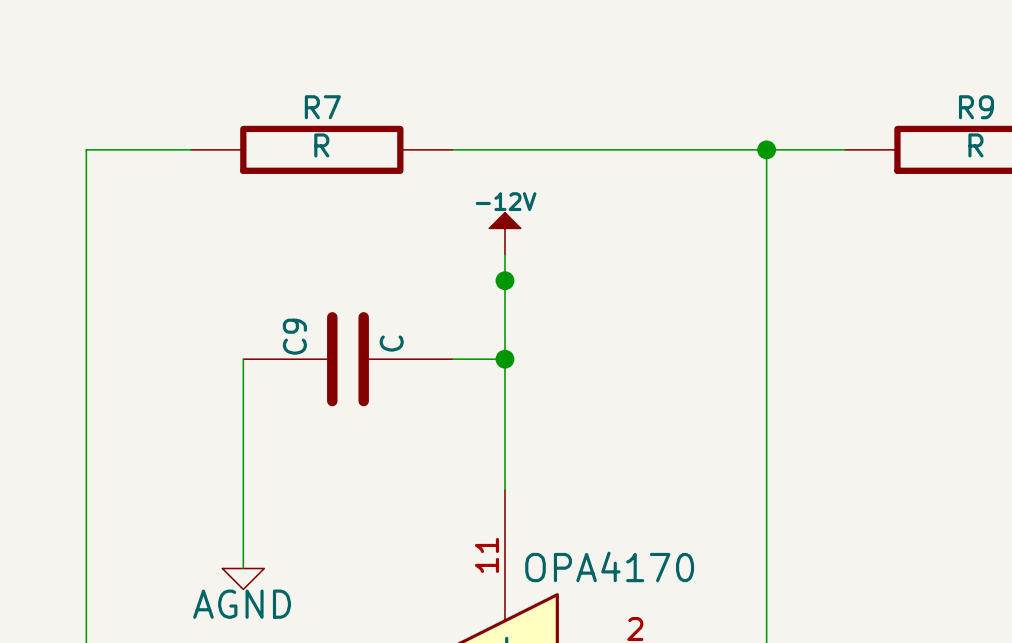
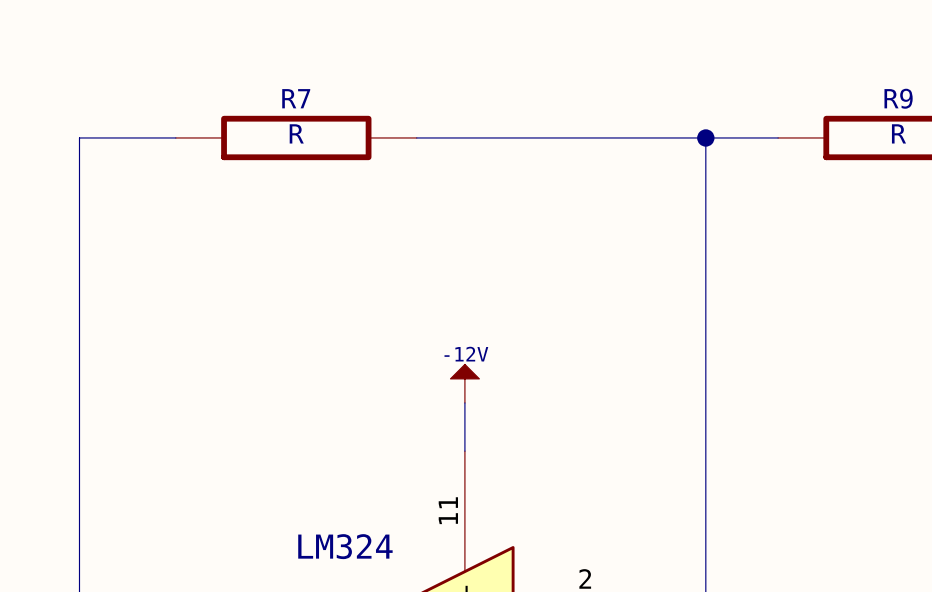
power symbol position: -12V (504, 233) -> -12V (464, 383)
wire: (504, 254) (504, 437) -> none
junction: (504, 280) -> none
wire: (243, 359) (243, 568) -> none
C9: C (347, 359) -> none
wire: (452, 359) (504, 359) -> none
junction: (504, 359) -> none
part value: OPA4170 (609, 566) -> LM324 (345, 546)
power symbol: AGND (243, 578) -> none

